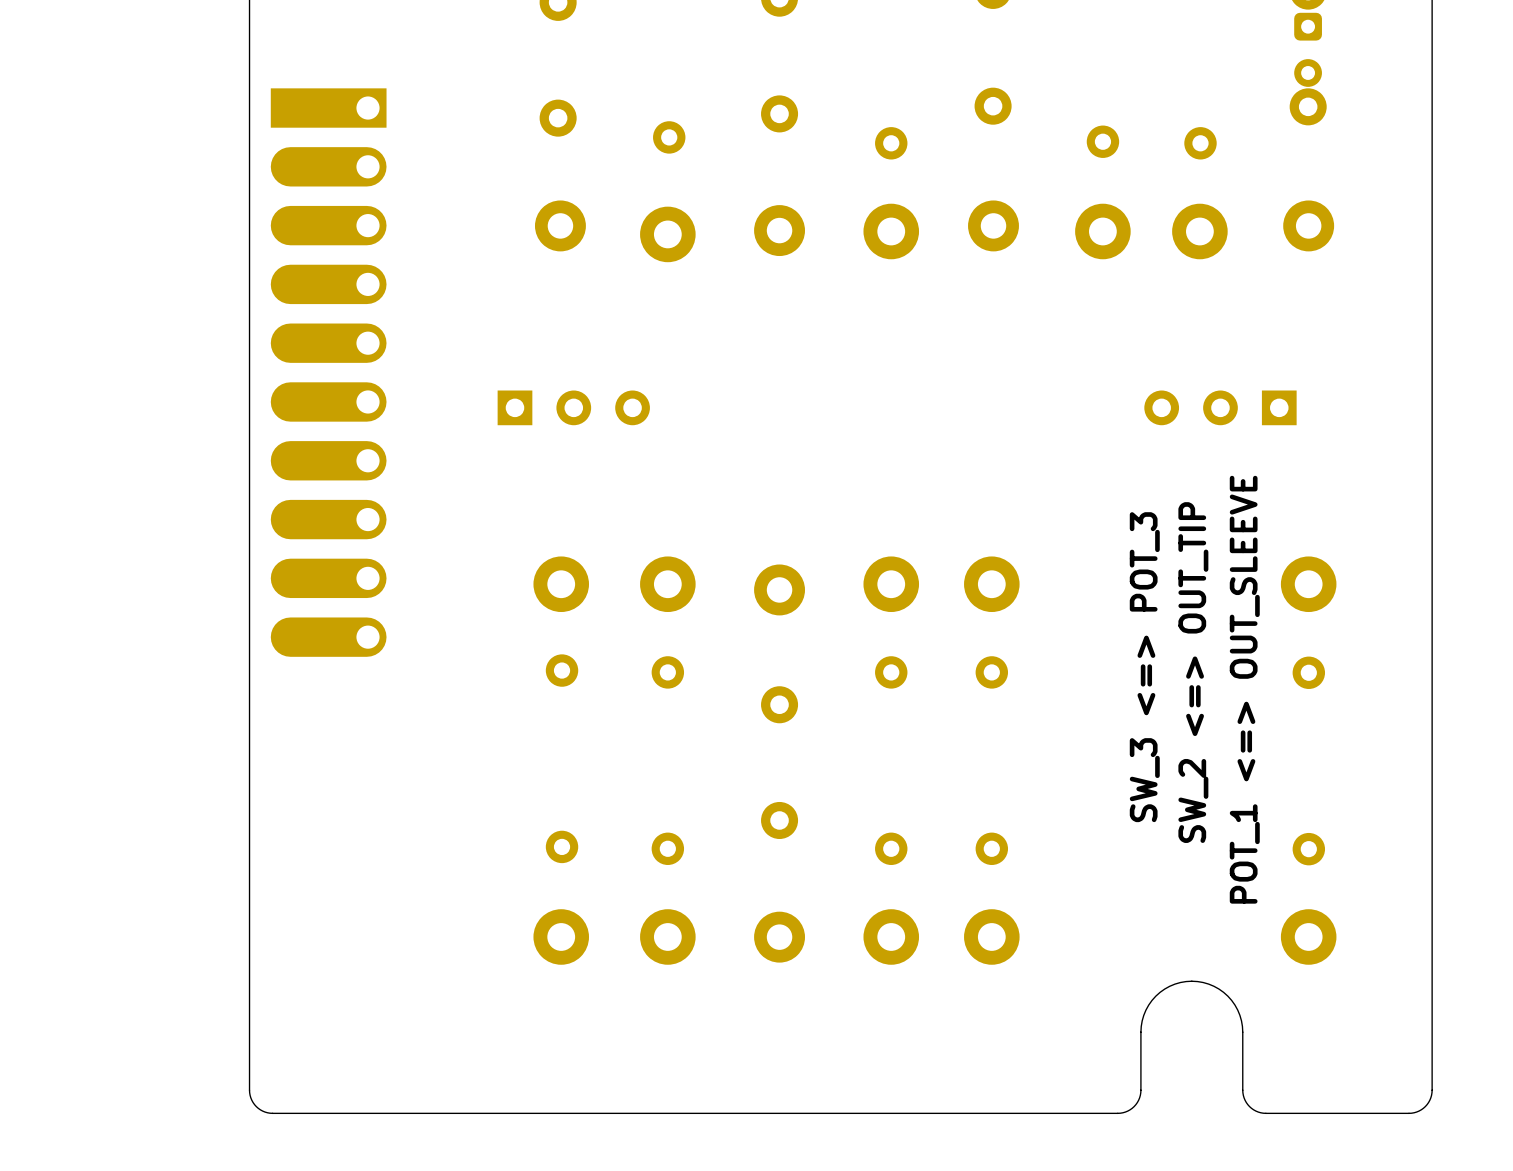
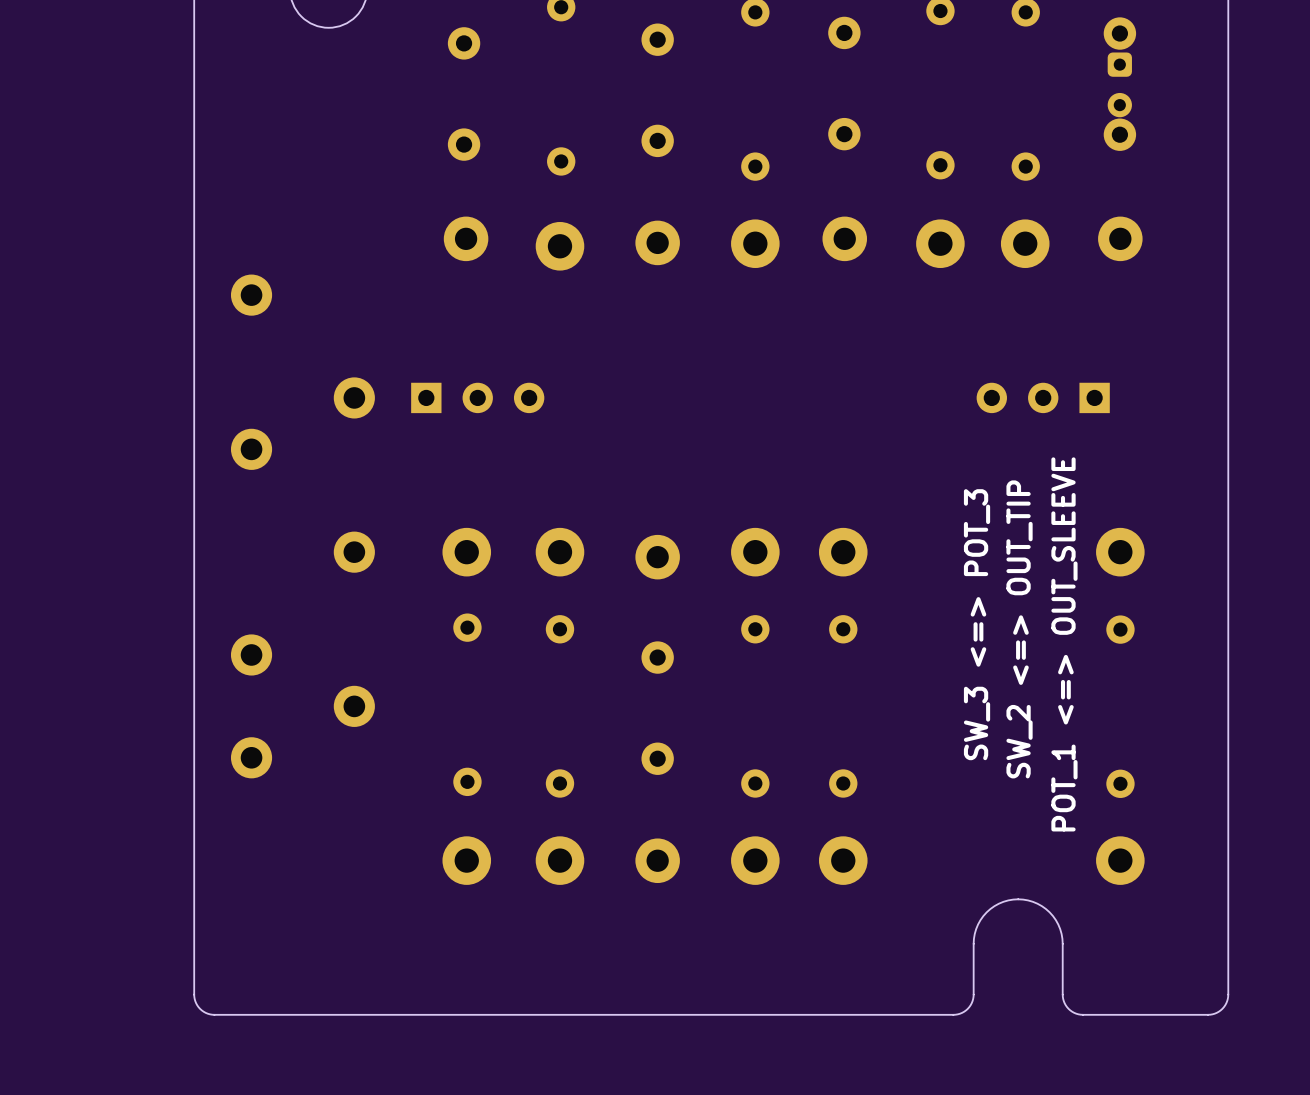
part: none -> (251, 295)
part: (328, 372) -> none
part: none -> (354, 397)
part: none -> (251, 449)
part: none -> (354, 552)
part: none -> (251, 654)
part: none -> (354, 706)
part: none -> (251, 757)

